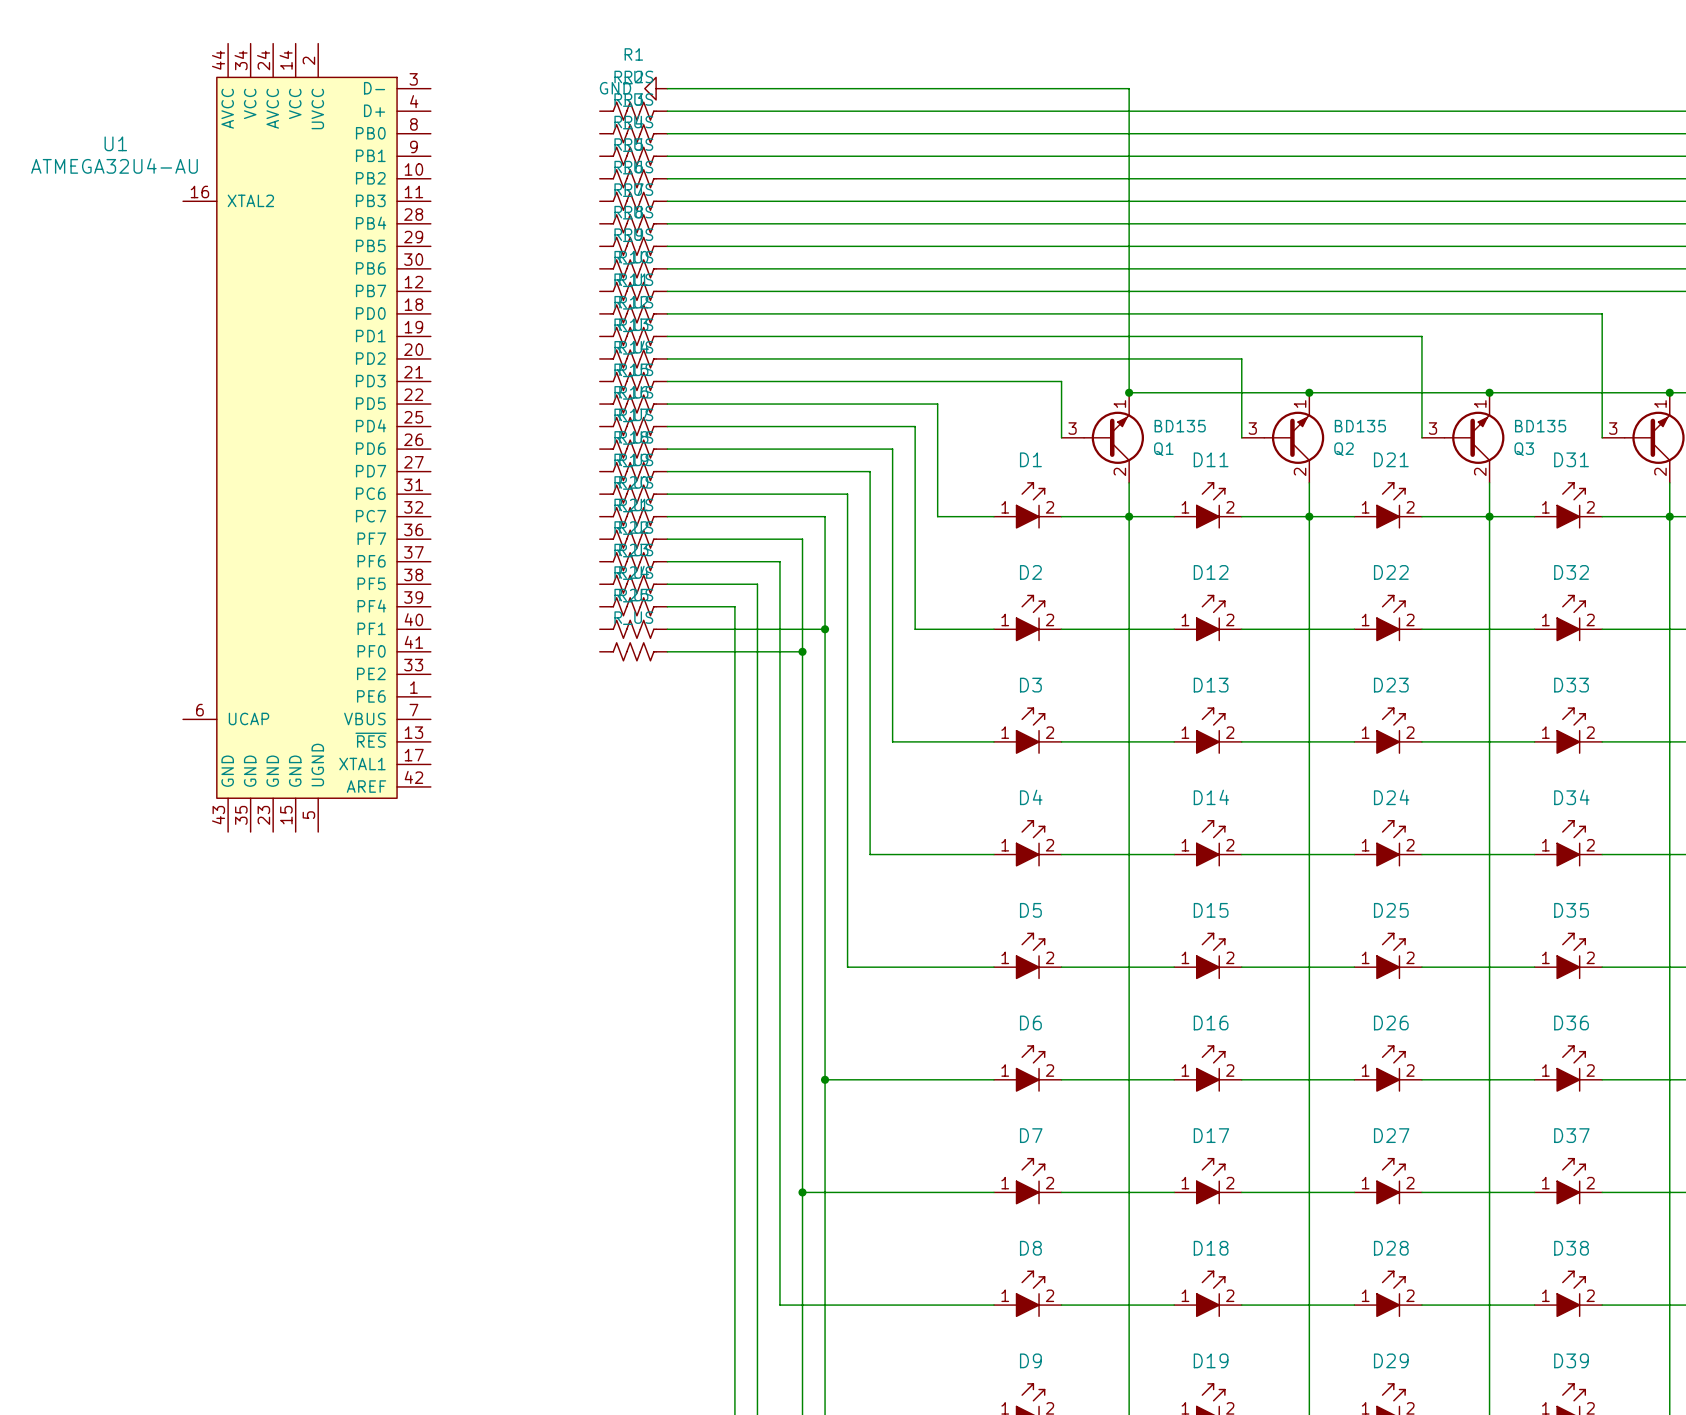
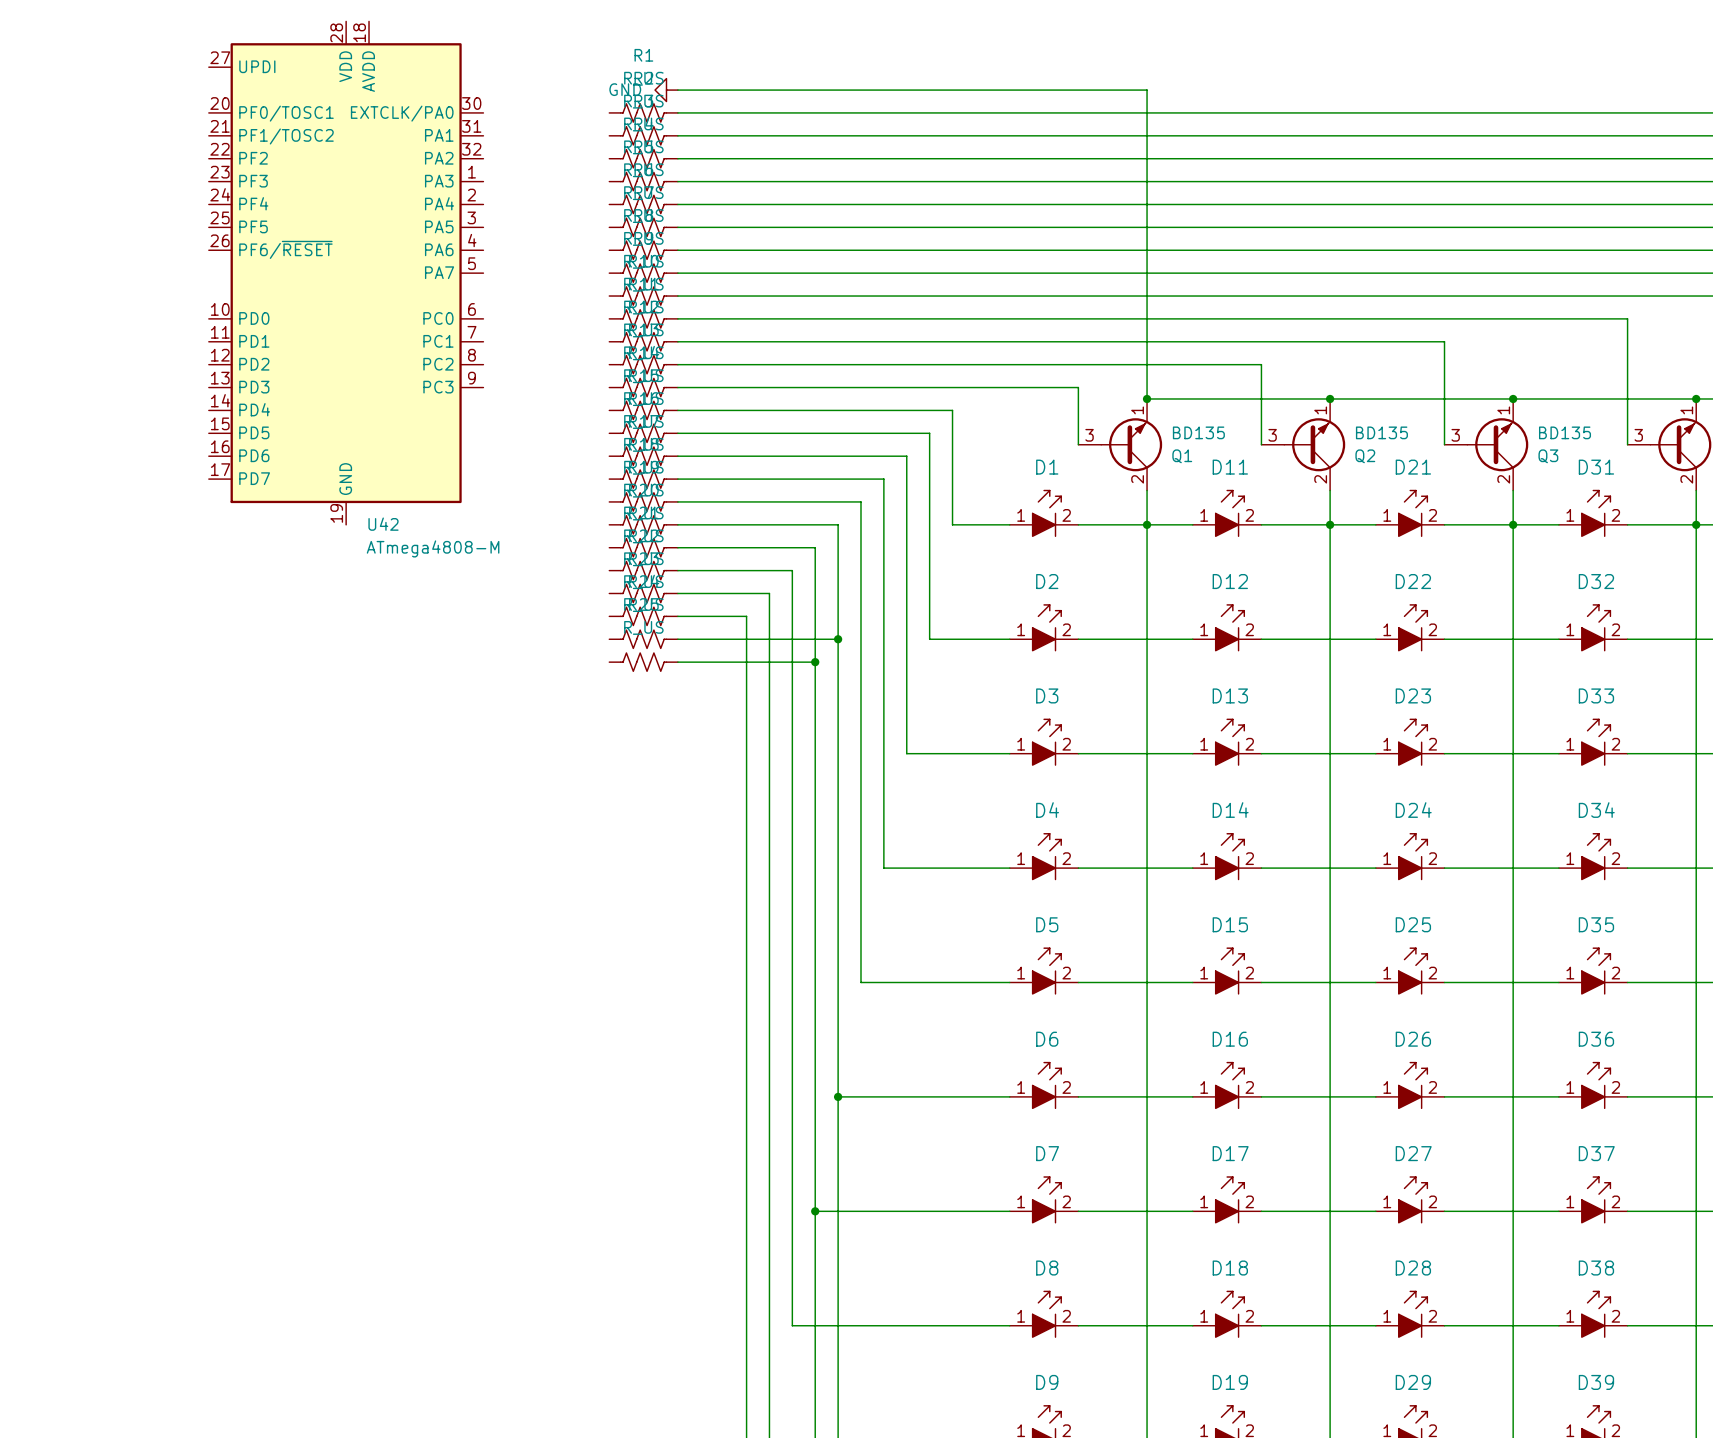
U42: none -> ATmega4808-M (346, 273)
U1: ATMEGA32U4-AU (306, 437) -> none

